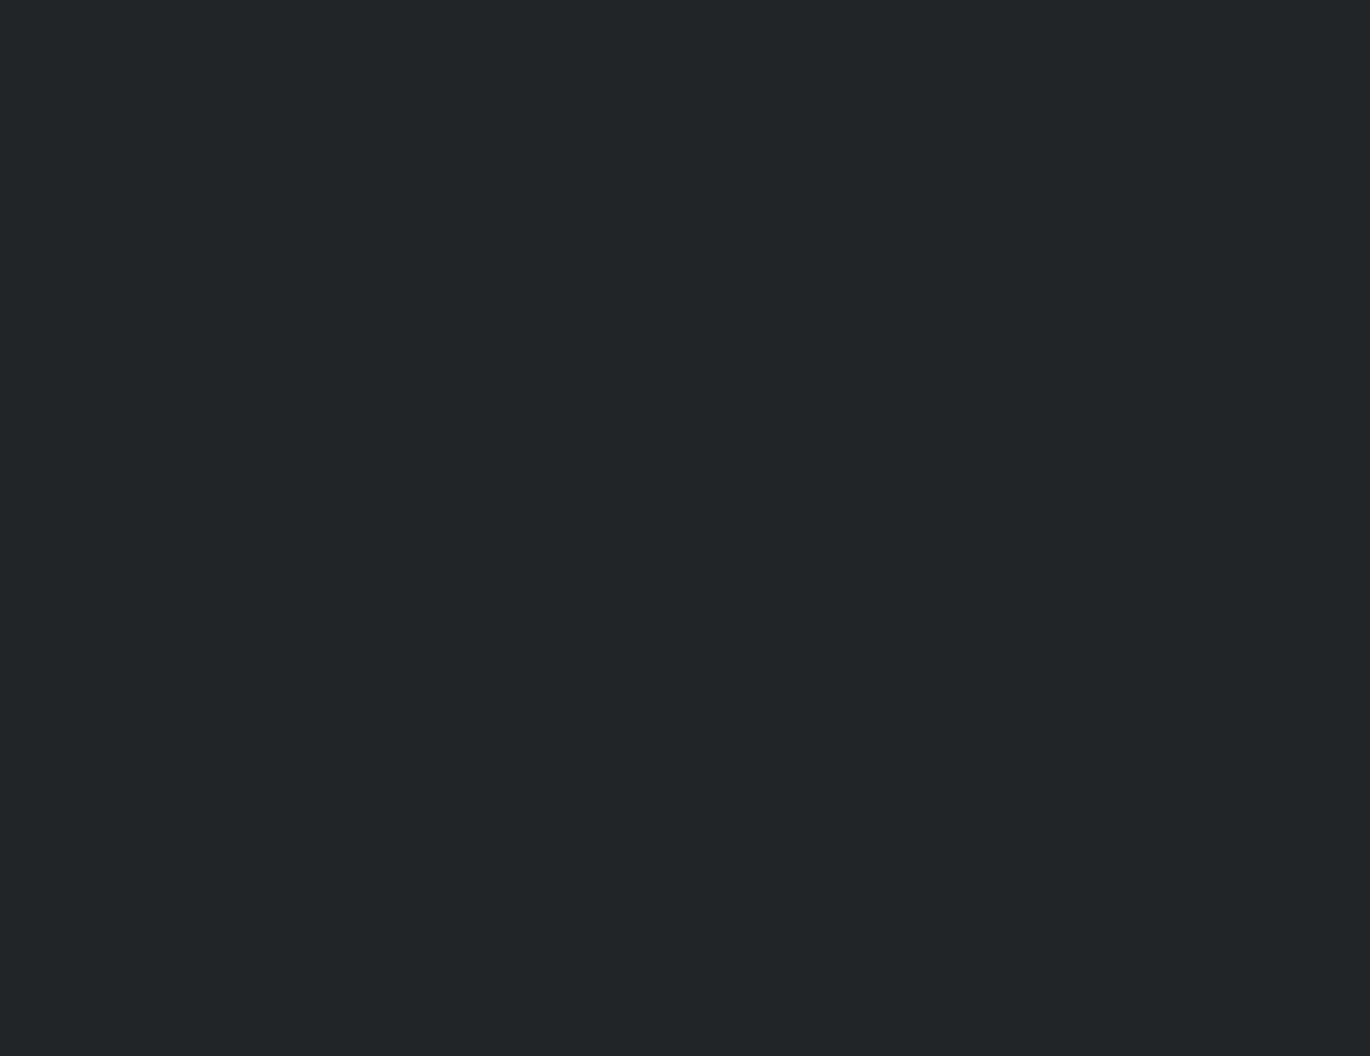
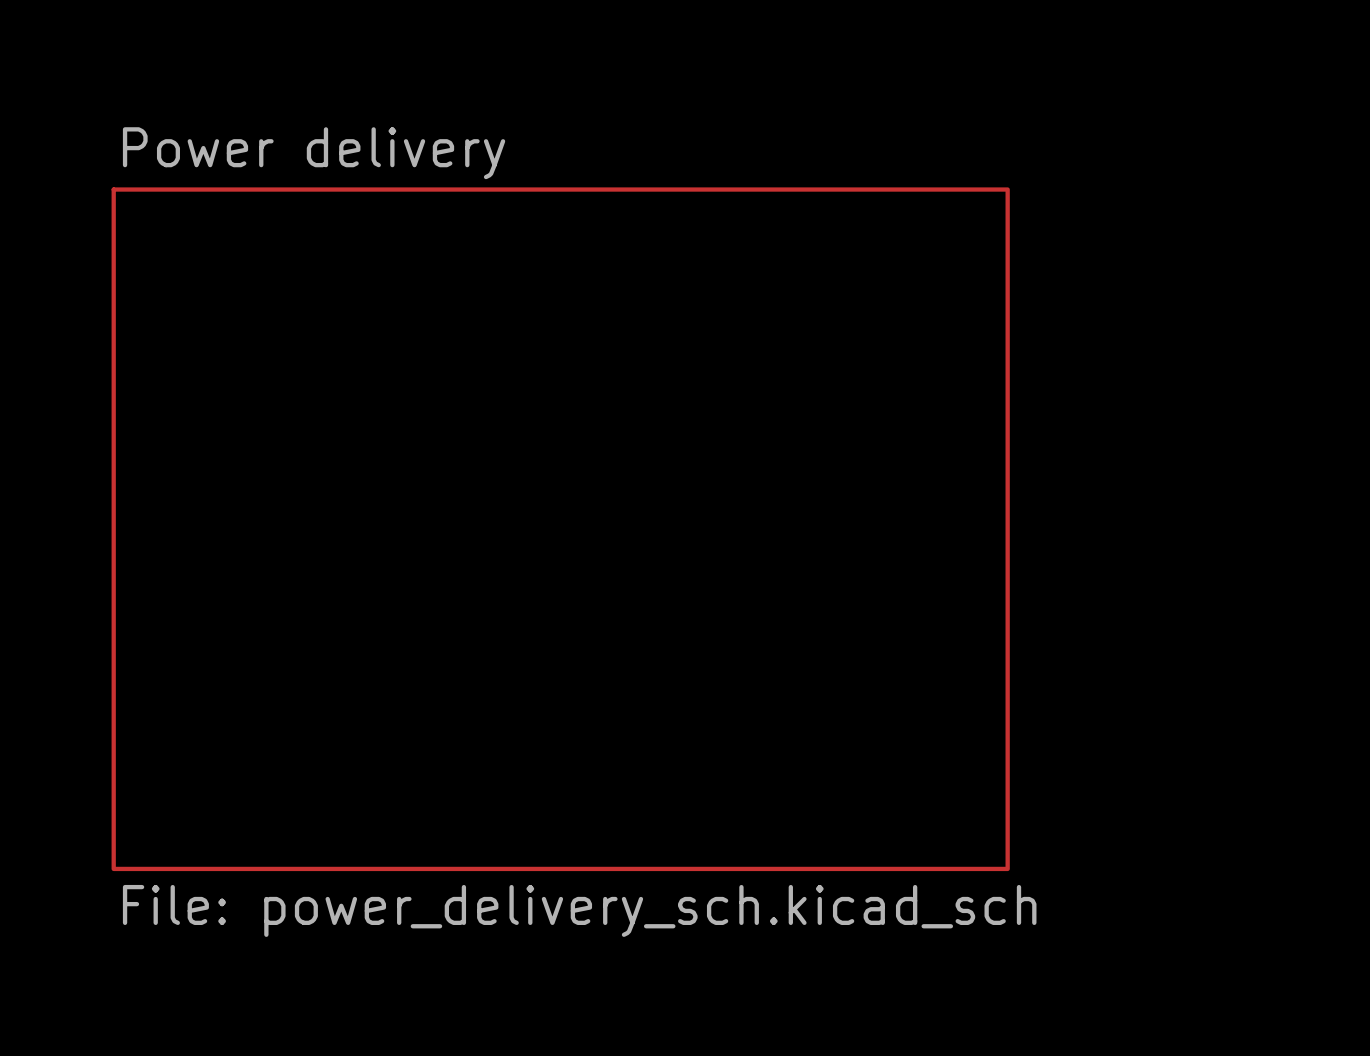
sheet Power delivery: none -> File: power_delivery_sch.kicad_sch (560, 529)

